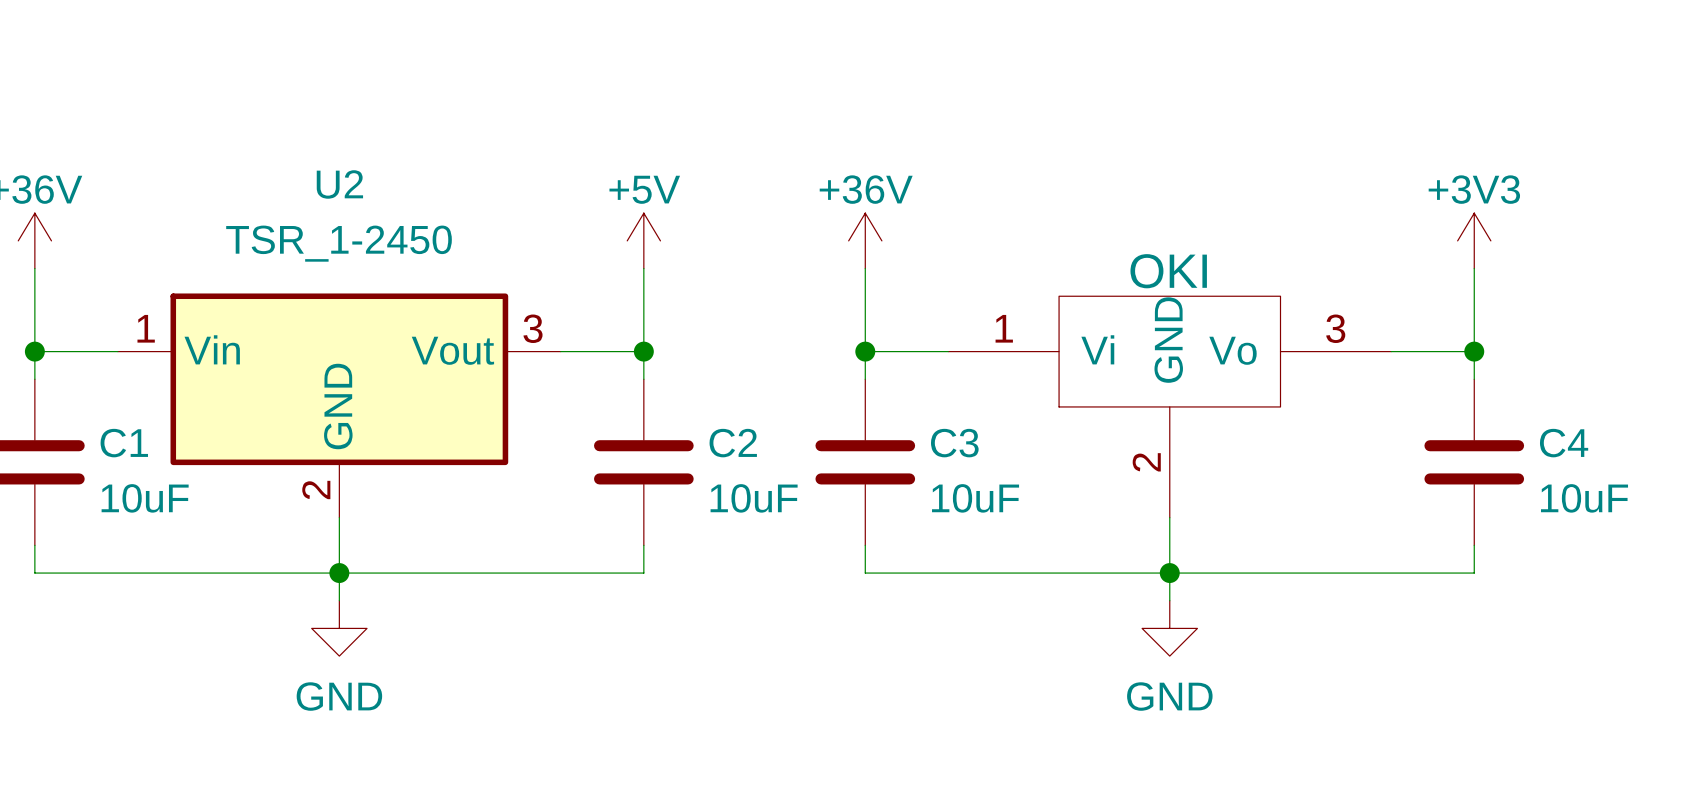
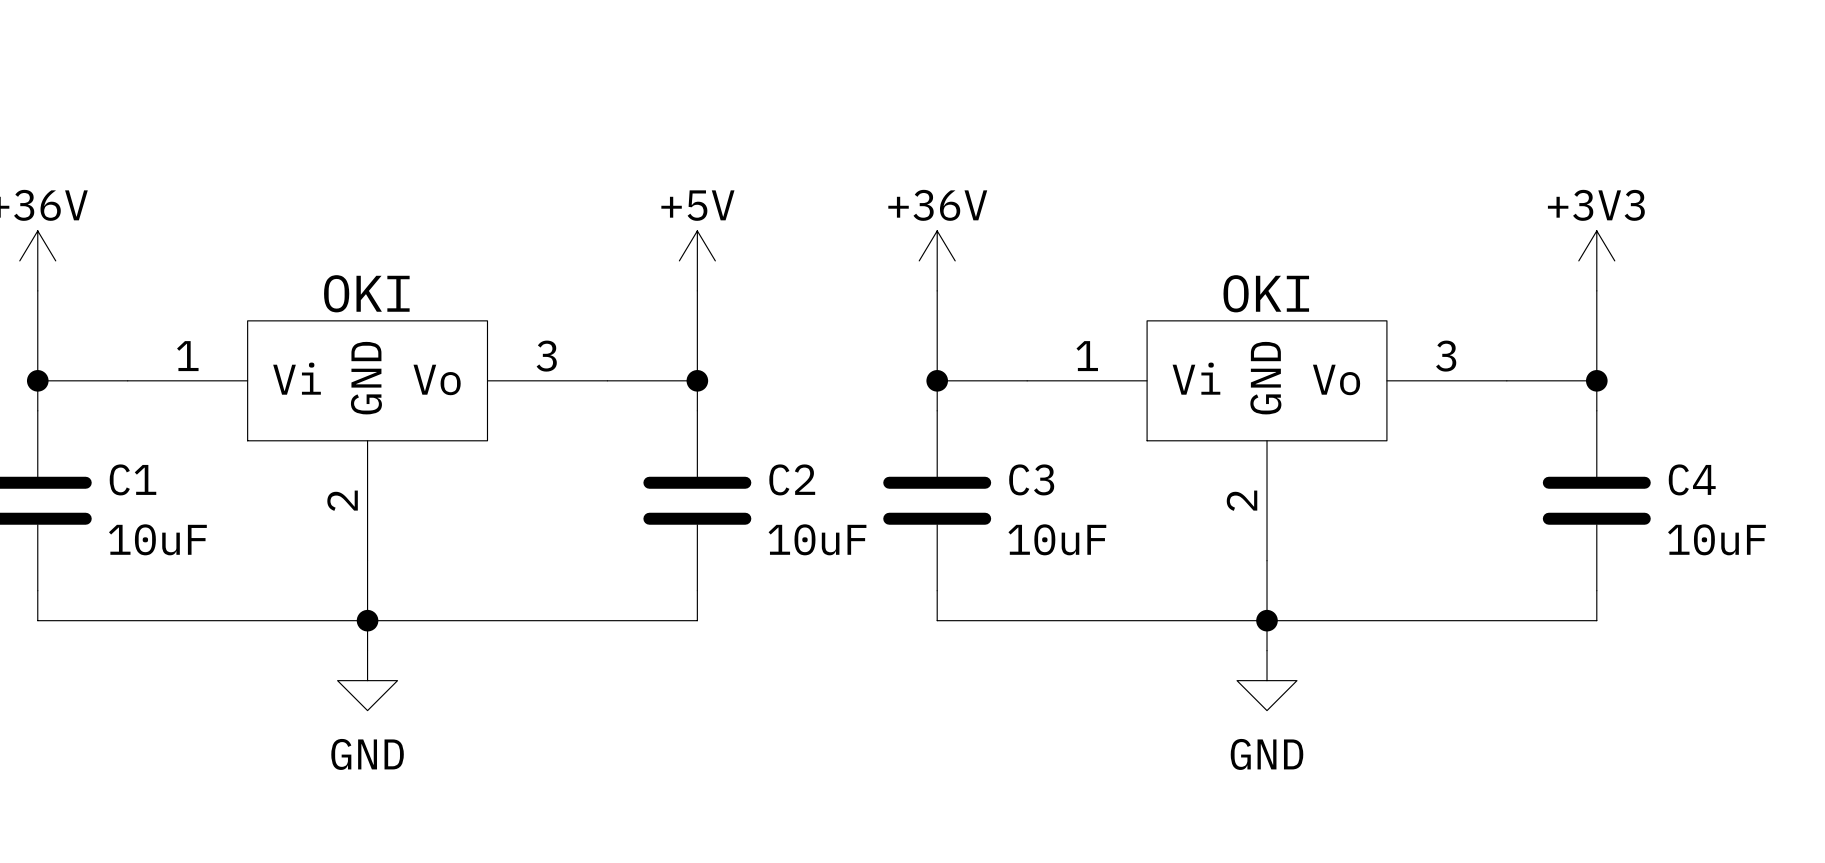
U2: TSR_1-2450 (339, 405) -> none
part: none -> OKI (367, 440)

